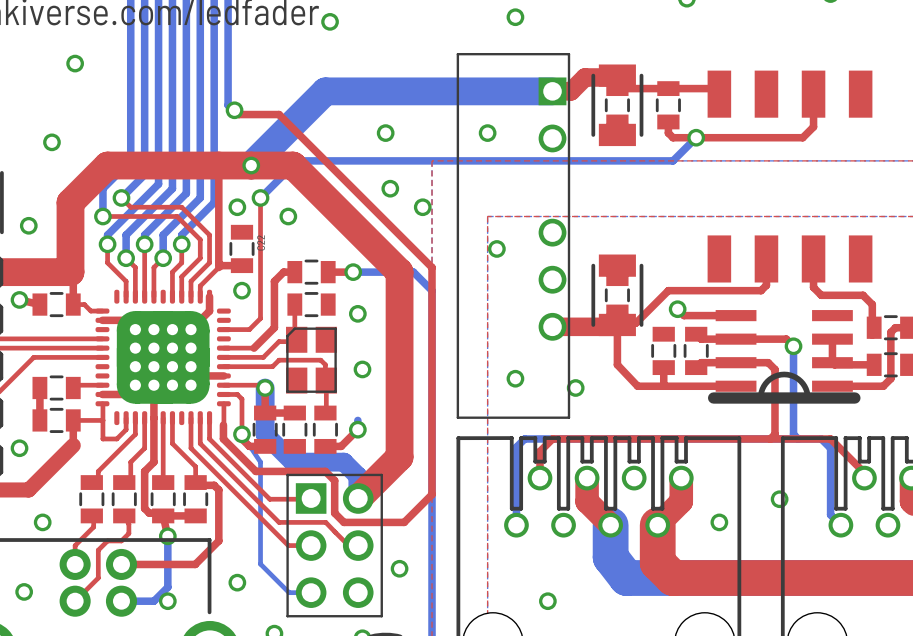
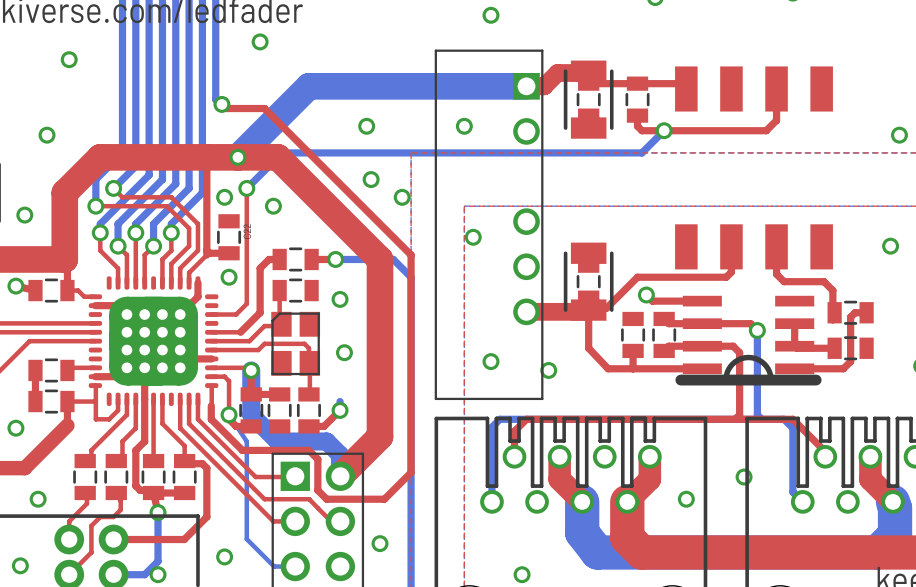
via: (330, 21) -> none
via: none -> (260, 41)

